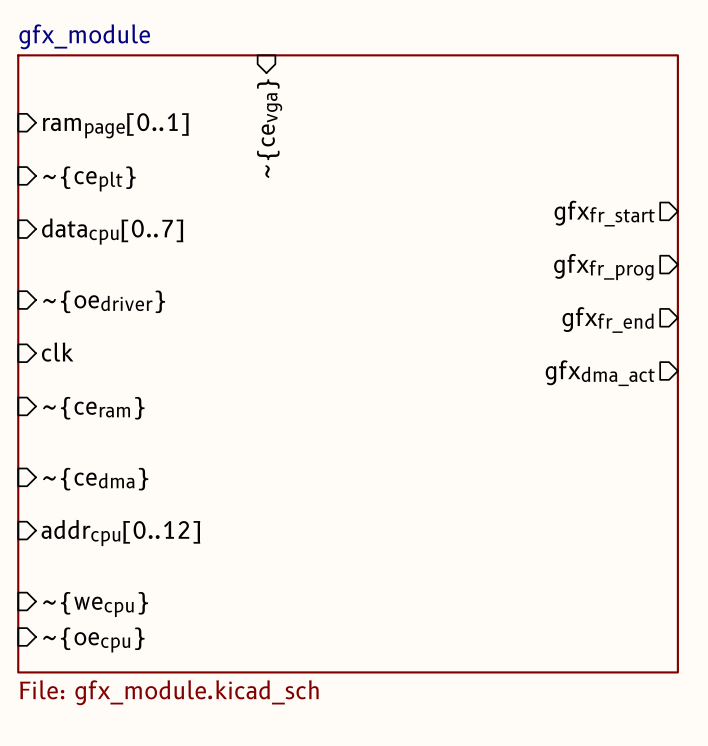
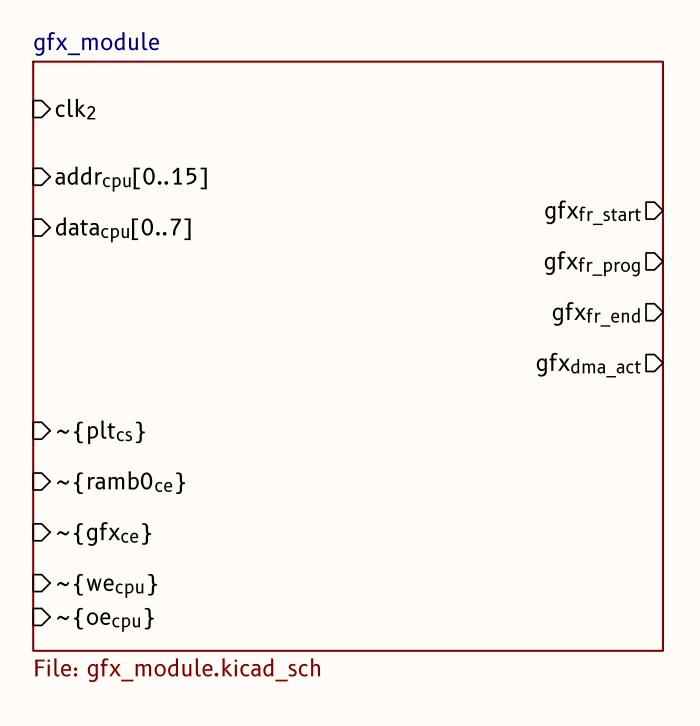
sheet pin: none -> clk2 (75, 109)
sheet pin: rampage[0..1] (115, 125) -> none
sheet pin: ~{cevga} (269, 128) -> none
sheet pin: ~{ceplt} (89, 178) -> addrcpu[0..15] (131, 179)
sheet pin: ~{oedriver} (104, 301) -> none
sheet pin: clk (57, 352) -> none
sheet pin: ~{ceram} (93, 408) -> none
sheet pin: none -> ~{pltcs} (100, 432)
sheet pin: ~{cedma} (95, 479) -> none
sheet pin: none -> ~{ramb0ce} (120, 482)
sheet pin: addrcpu[0..12] (120, 532) -> none
sheet pin: none -> ~{gfxce} (103, 534)

